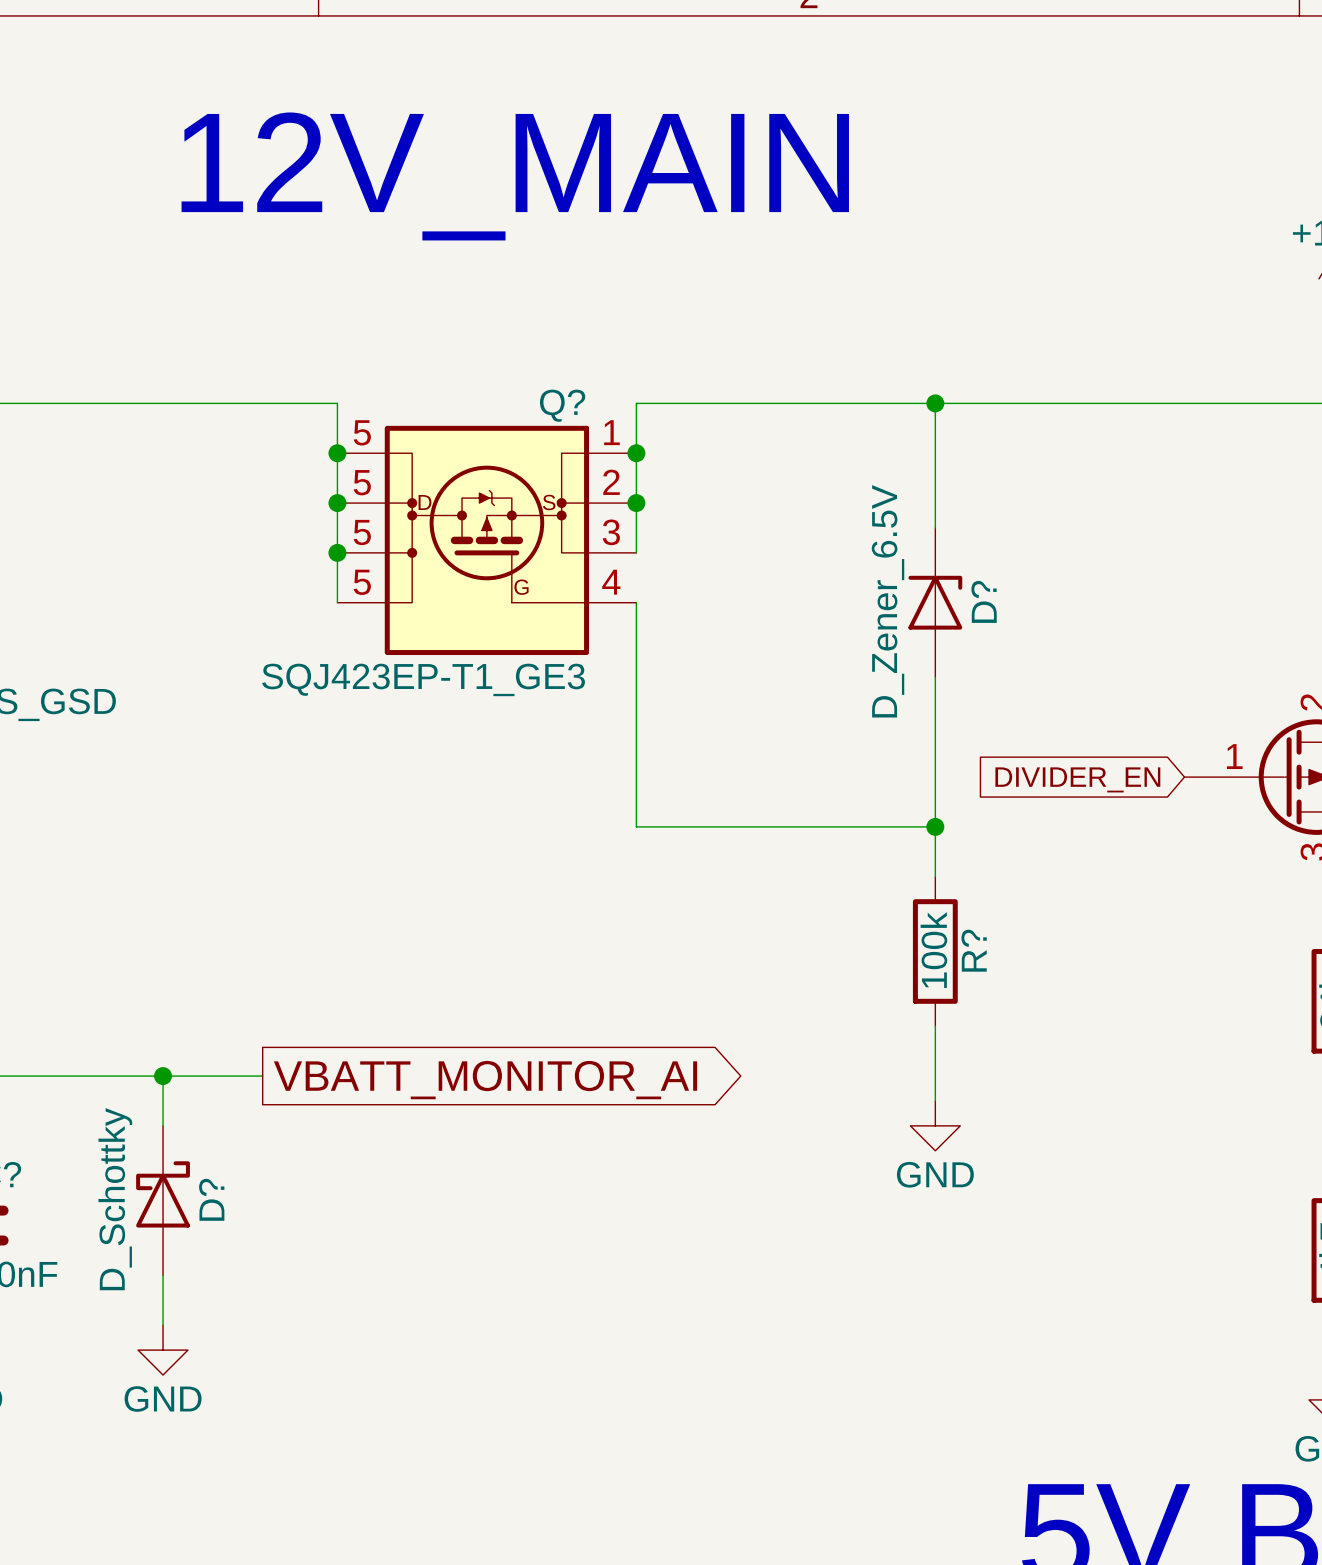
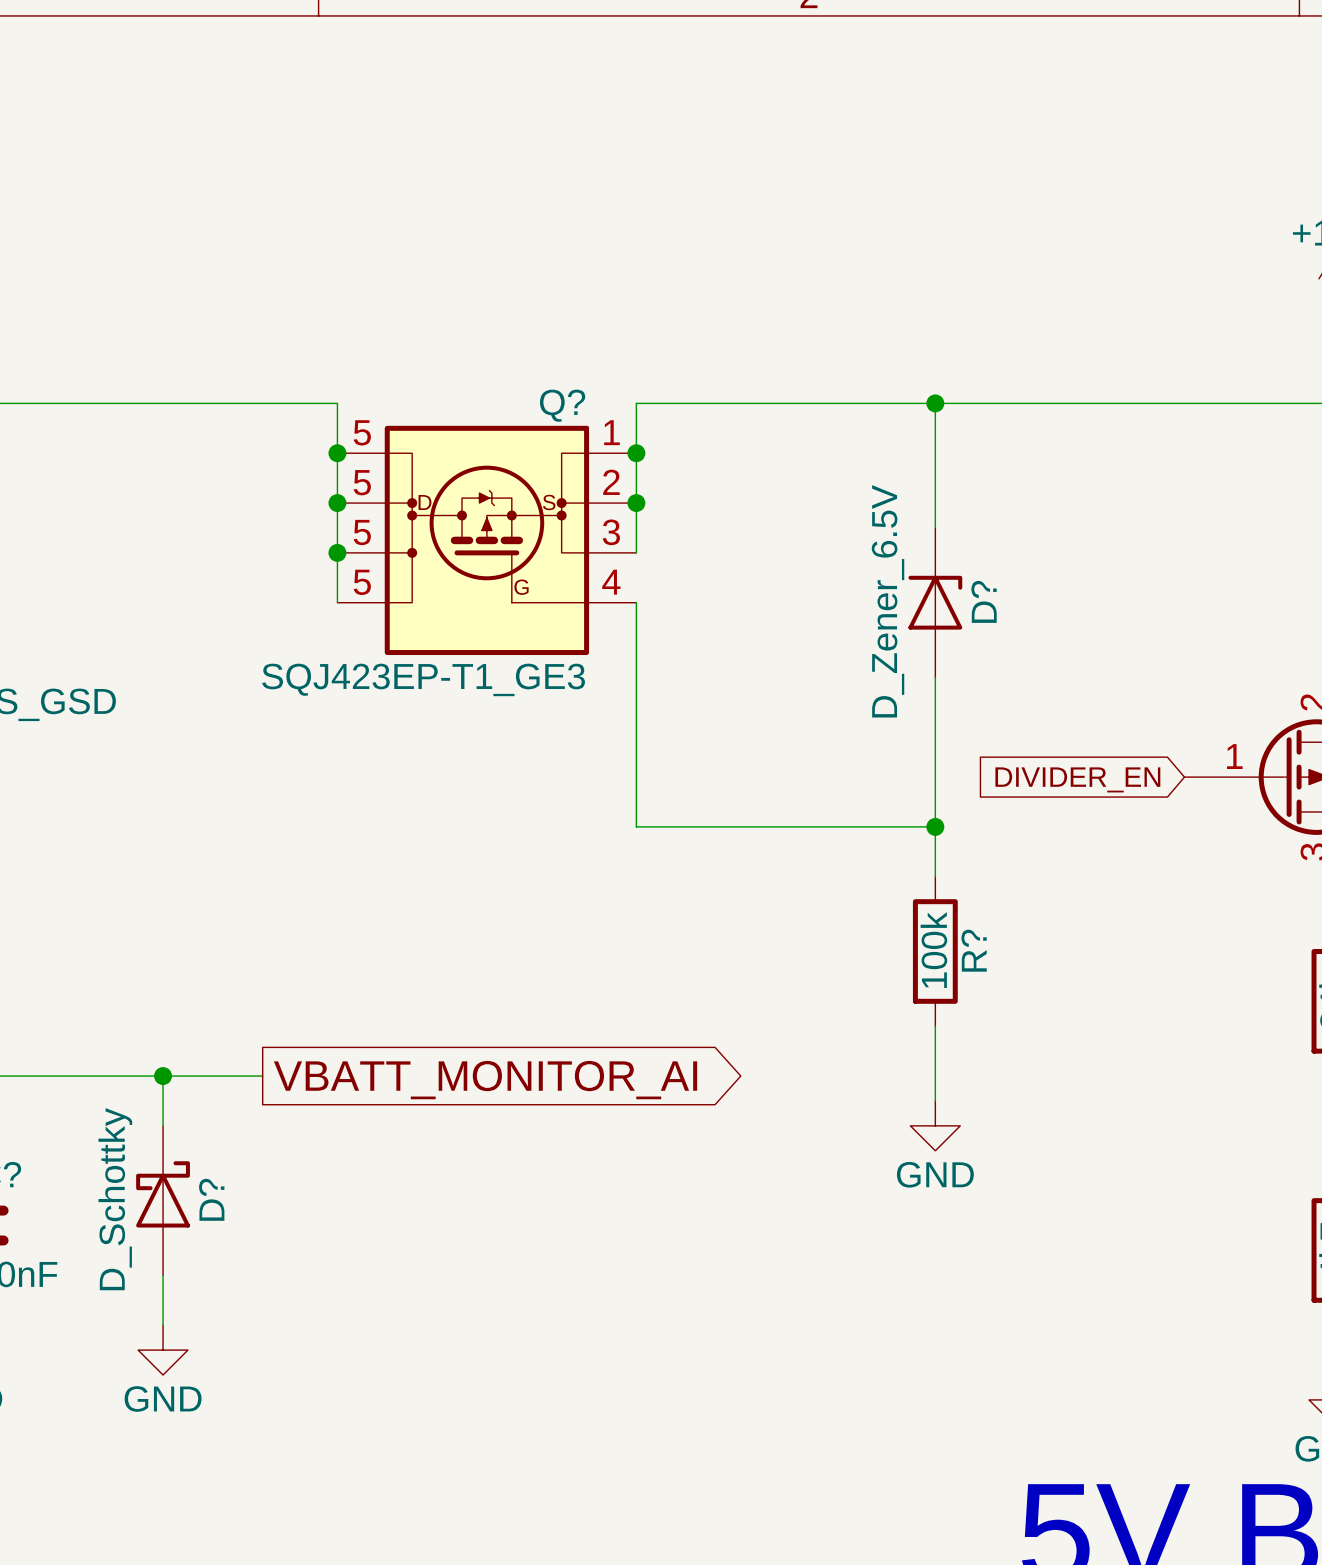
text: 12V_MAIN (515, 176) -> none

